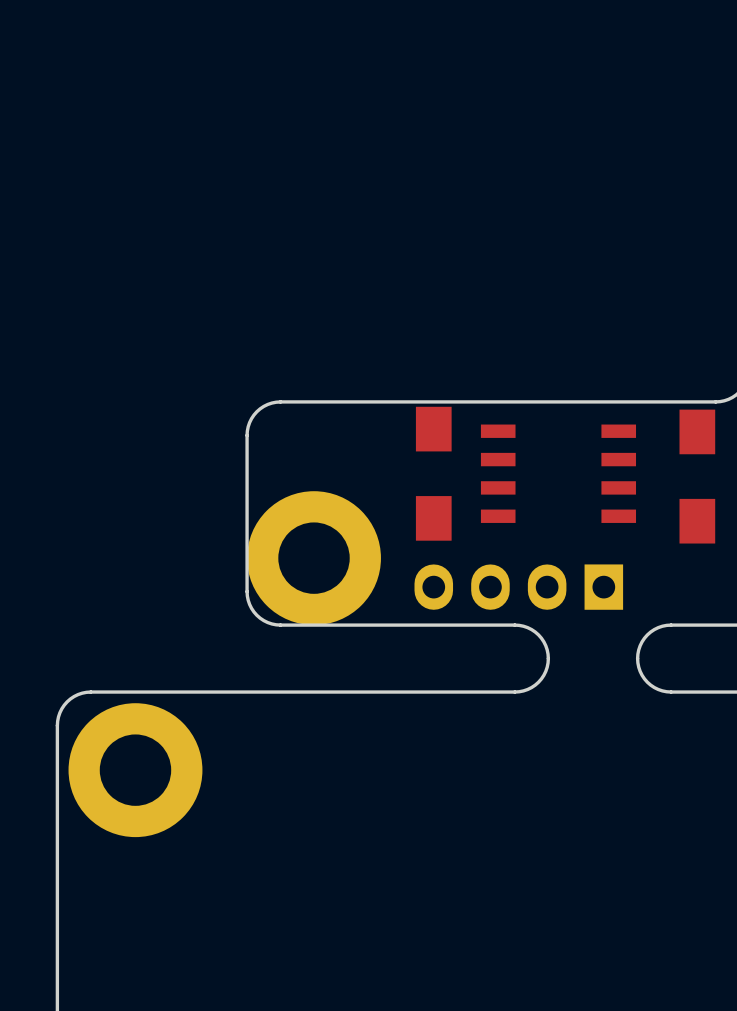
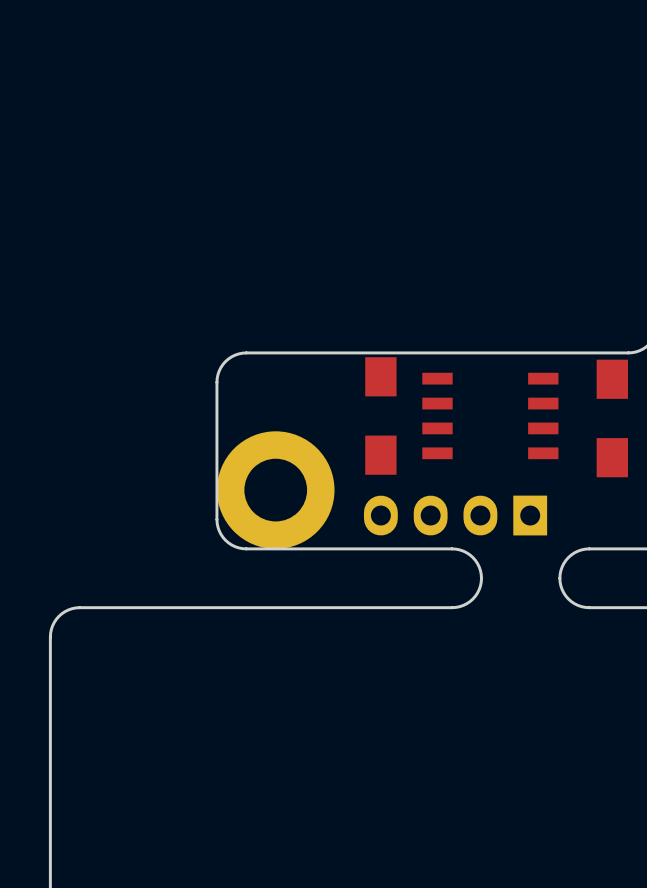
part: (135, 770) -> none

